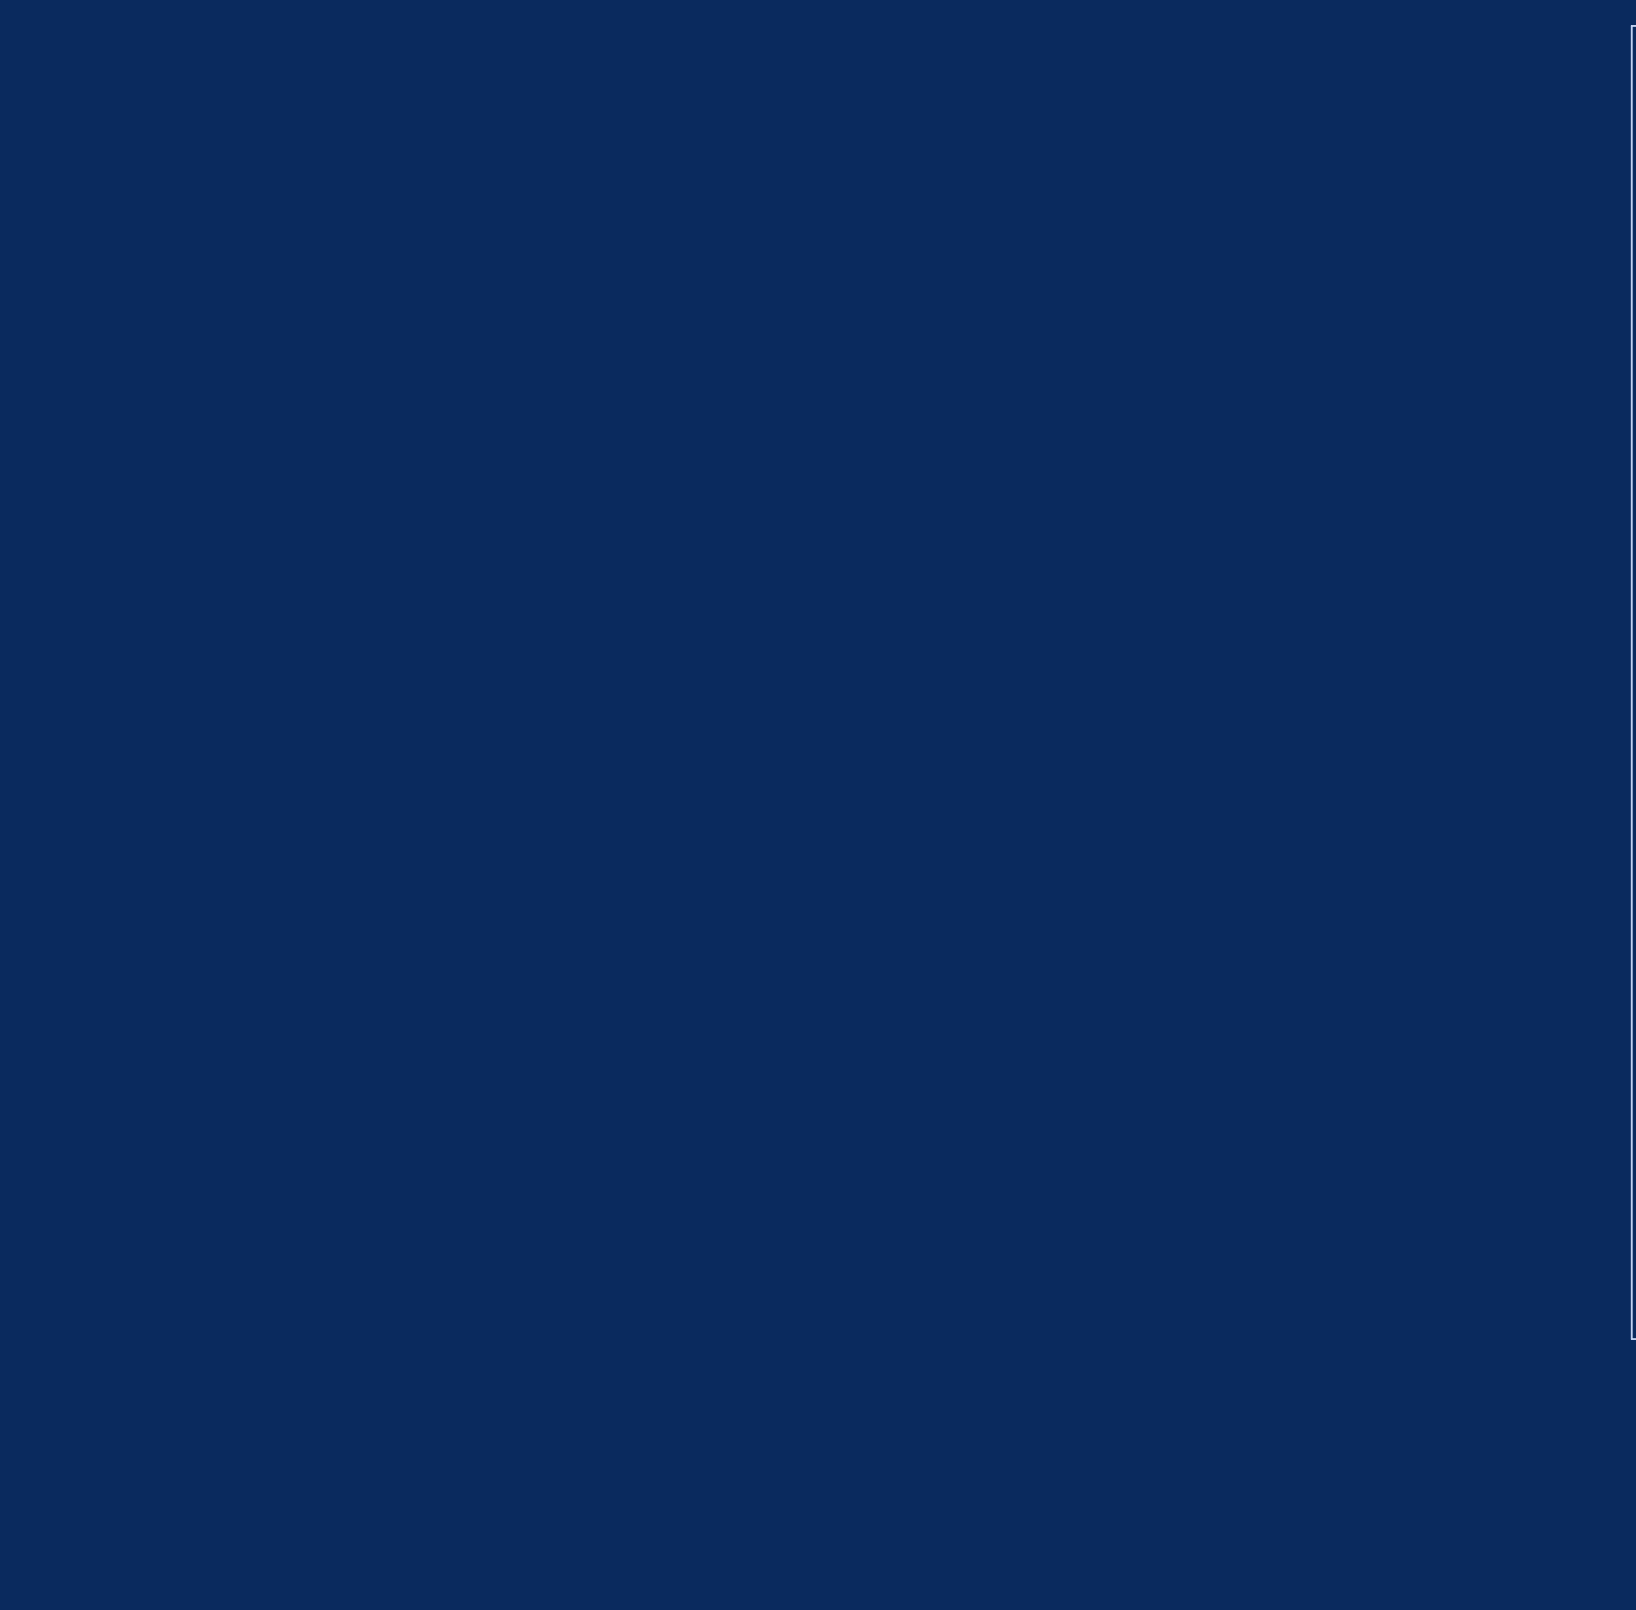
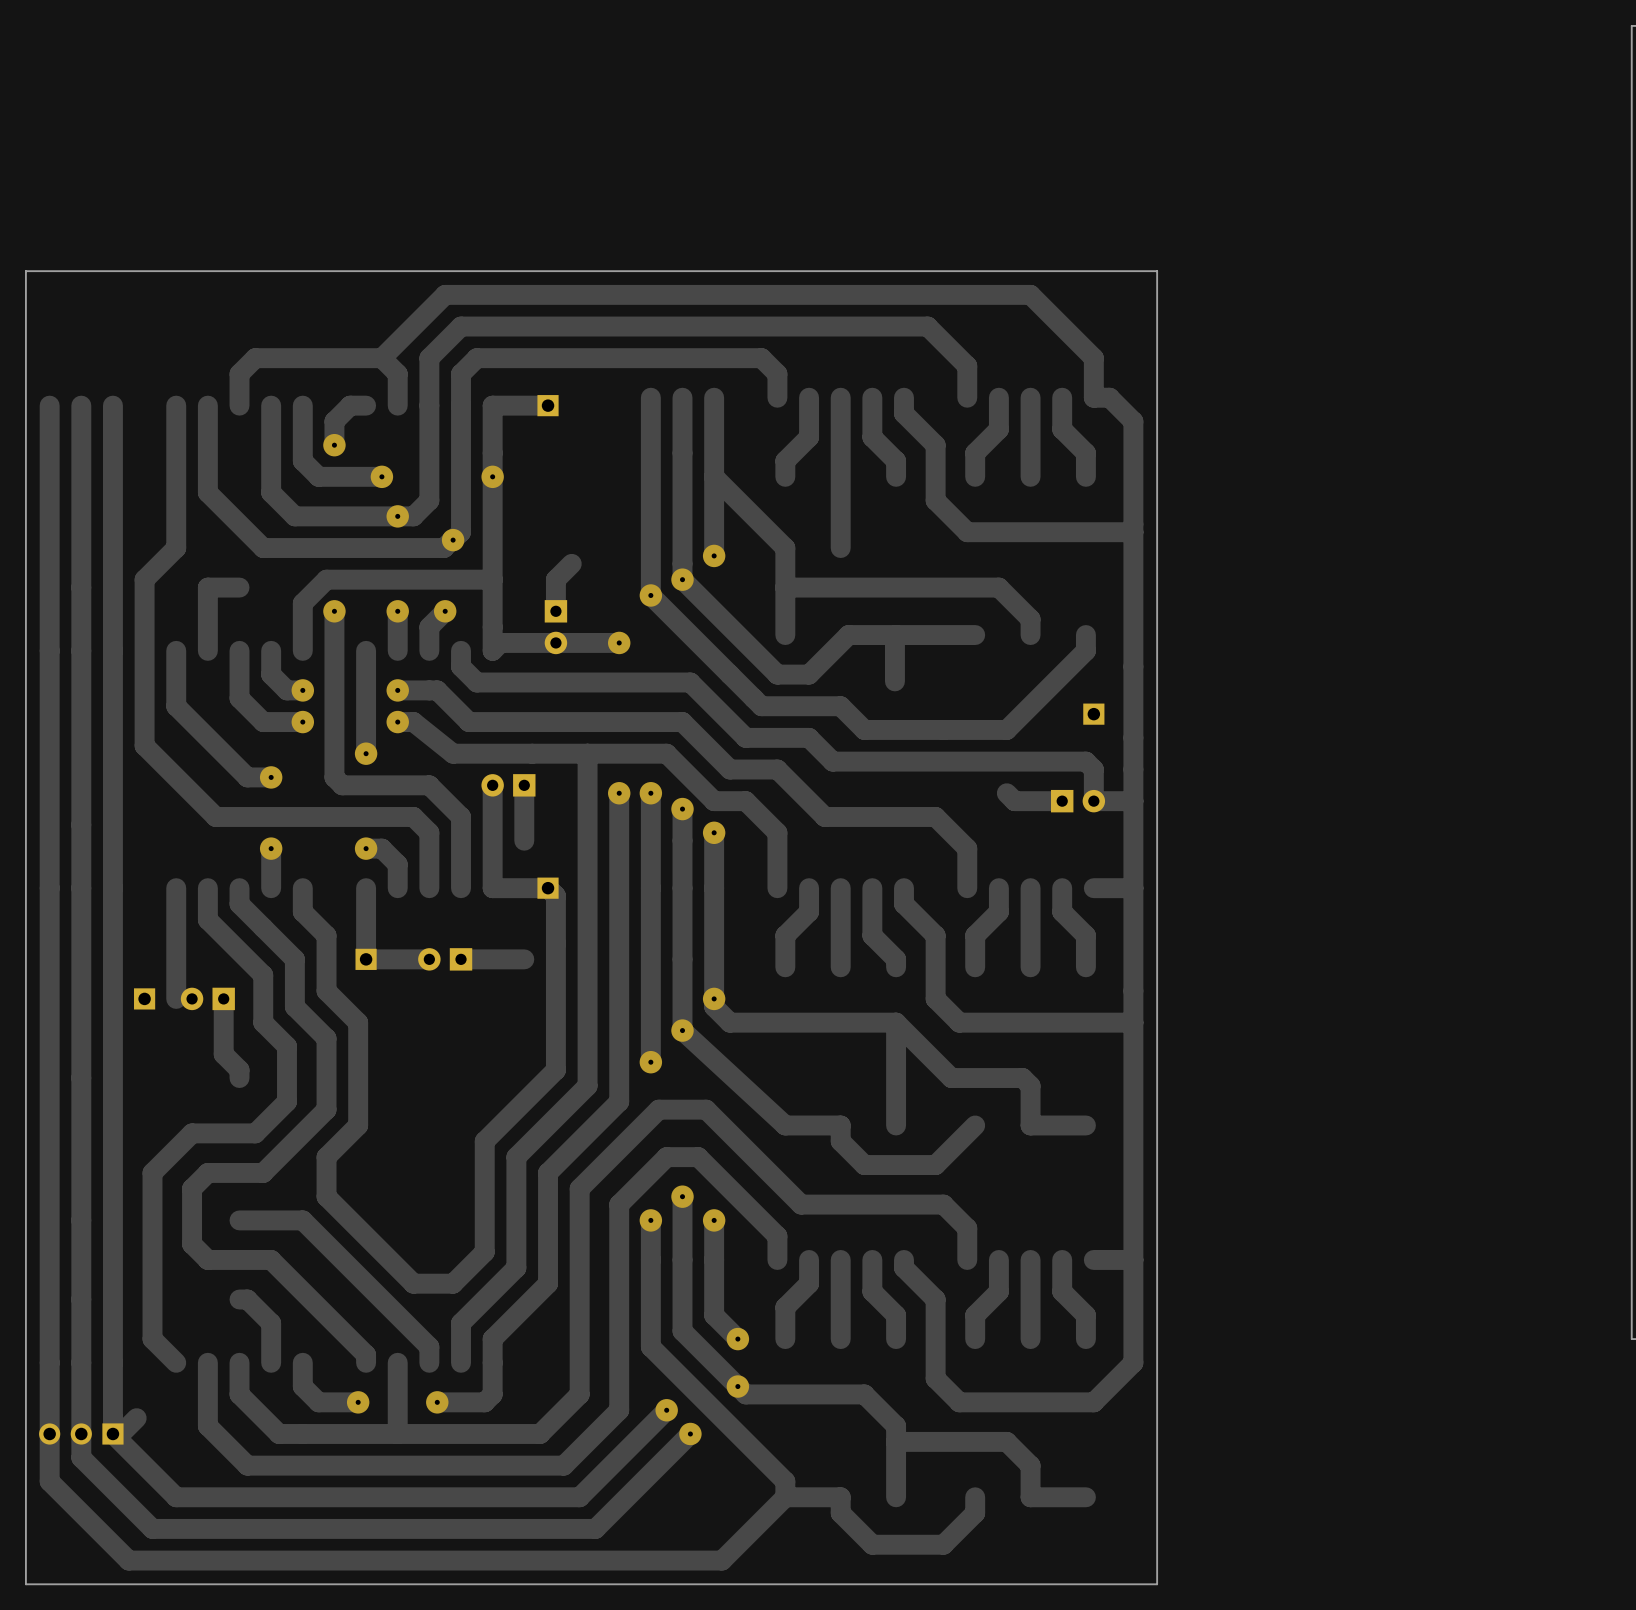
board edge: none -> (1157, 271) (1157, 1584) (25, 1584) (25, 271) (1157, 271)
track: none -> (381, 358) (397, 373) (397, 405)
track: none -> (381, 358) (255, 358) (239, 373) (239, 405)
track: none -> (381, 358) (445, 294) (1030, 294) (1093, 358) (1093, 397) (1109, 397) (1133, 421) (1133, 1362) (1093, 1402) (959, 1402) (935, 1378) (935, 1299) (903, 1267) (903, 1259)
track: none -> (650, 397) (650, 595) (761, 706) (840, 706) (864, 729) (1006, 729) (1085, 650) (1085, 635)
track: none -> (682, 397) (682, 579) (777, 674) (809, 674) (848, 635) (975, 635)
track: none -> (714, 397) (714, 555)
track: none -> (777, 397) (777, 373) (761, 358) (476, 358) (461, 373) (461, 532) (444, 548) (263, 548) (207, 492) (207, 405)
track: none -> (809, 397) (809, 437) (785, 461) (785, 476)
track: none -> (840, 397) (840, 548)
track: none -> (872, 397) (872, 437) (896, 461) (896, 476)
track: none -> (903, 397) (903, 413) (935, 445) (935, 500) (967, 532) (1133, 532)
track: none -> (967, 397) (967, 366) (927, 326) (461, 326) (429, 358) (429, 500) (413, 516) (294, 516) (271, 492) (271, 405)
track: none -> (998, 397) (998, 429) (975, 453) (975, 476)
track: none -> (1030, 397) (1030, 476)
track: none -> (1062, 397) (1062, 429) (1085, 453) (1085, 476)
track: none -> (49, 405) (49, 1481) (128, 1560) (722, 1560) (785, 1497)
track: none -> (81, 405) (81, 1457) (152, 1528) (595, 1528) (690, 1433)
track: none -> (112, 405) (112, 1433)
track: none -> (176, 405) (176, 548) (144, 579) (144, 745) (215, 816) (413, 816) (429, 832) (429, 888)
track: none -> (302, 405) (302, 461) (318, 476) (381, 476)
track: none -> (366, 405) (350, 405) (334, 421) (334, 445)
track: none -> (548, 405) (492, 405) (492, 650) (500, 642) (619, 642)
part: none -> (548, 405)
via: none -> (334, 445)
via: none -> (381, 476)
via: none -> (492, 476)
track: none -> (714, 476) (785, 548) (785, 635)
via: none -> (397, 516)
via: none -> (453, 540)
via: none -> (714, 555)
track: none -> (571, 563) (555, 579) (555, 611)
track: none -> (492, 579) (326, 579) (302, 603) (302, 650)
via: none -> (682, 579)
track: none -> (239, 587) (207, 587) (207, 650)
track: none -> (785, 587) (998, 587) (1030, 619) (1030, 635)
via: none -> (650, 595)
track: none -> (334, 611) (334, 777) (342, 785) (429, 785) (461, 816) (461, 888)
via: none -> (334, 611)
track: none -> (397, 611) (397, 650)
via: none -> (397, 611)
track: none -> (445, 611) (429, 627) (429, 650)
via: none -> (445, 611)
part: none -> (555, 627)
track: none -> (896, 635) (894, 681)
via: none -> (619, 642)
track: none -> (176, 650) (176, 706) (247, 777) (271, 777)
track: none -> (239, 650) (239, 698) (263, 722) (302, 722)
track: none -> (271, 650) (271, 674) (286, 690) (302, 690)
track: none -> (366, 650) (366, 753)
track: none -> (461, 650) (461, 666) (476, 682) (690, 682) (745, 737) (809, 737) (832, 761) (1085, 761) (1093, 769) (1093, 801) (1133, 801)
via: none -> (302, 690)
track: none -> (397, 690) (437, 690) (468, 722) (682, 722) (729, 769) (777, 769) (824, 816) (935, 816) (967, 848) (967, 888)
via: none -> (397, 690)
part: none -> (1093, 714)
via: none -> (302, 722)
track: none -> (397, 722) (413, 722) (453, 753) (666, 753) (714, 801) (745, 801) (777, 832) (777, 888)
via: none -> (397, 722)
via: none -> (366, 753)
track: none -> (587, 753) (587, 1085) (516, 1157) (516, 1267) (461, 1323) (461, 1362)
via: none -> (271, 777)
track: none -> (492, 785) (492, 888) (548, 888) (555, 896) (555, 1070) (484, 1141) (484, 1252) (453, 1283) (413, 1283) (326, 1196) (326, 1157) (358, 1125) (358, 1022) (326, 991) (326, 935) (302, 911) (302, 888)
part: none -> (508, 785)
track: none -> (524, 785) (524, 840)
track: none -> (619, 793) (619, 1101) (548, 1172) (548, 1283) (492, 1339) (492, 1394) (484, 1402) (437, 1402)
via: none -> (619, 793)
track: none -> (650, 793) (650, 1062)
via: none -> (650, 793)
track: none -> (1006, 793) (1014, 801) (1062, 801)
part: none -> (1078, 801)
track: none -> (682, 809) (682, 1030) (785, 1125) (840, 1125) (840, 1141) (864, 1165) (935, 1165) (975, 1125)
via: none -> (682, 809)
track: none -> (714, 832) (714, 1006) (729, 1022) (896, 1022)
via: none -> (714, 832)
track: none -> (271, 848) (271, 888)
via: none -> (271, 848)
track: none -> (366, 848) (381, 848) (397, 864) (397, 888)
via: none -> (366, 848)
track: none -> (176, 888) (176, 998)
track: none -> (207, 888) (207, 919) (263, 975) (263, 1022) (286, 1046) (286, 1101) (255, 1133) (192, 1133) (152, 1172) (152, 1339) (176, 1362)
track: none -> (239, 888) (239, 903) (294, 959) (294, 1006) (326, 1038) (326, 1109) (263, 1172) (207, 1172) (192, 1188) (192, 1244) (207, 1259) (271, 1259) (366, 1354) (366, 1362)
track: none -> (366, 888) (366, 959) (429, 959)
part: none -> (548, 888)
track: none -> (809, 888) (809, 911) (785, 935) (785, 967)
track: none -> (840, 888) (840, 967)
track: none -> (872, 888) (872, 935) (896, 959) (896, 967)
track: none -> (903, 888) (903, 903) (935, 935) (935, 998) (959, 1022) (1133, 1022)
track: none -> (998, 888) (998, 911) (975, 935) (975, 967)
track: none -> (1030, 888) (1030, 967)
track: none -> (1062, 888) (1062, 911) (1085, 935) (1085, 967)
track: none -> (1133, 888) (1093, 888)
part: none -> (366, 959)
part: none -> (445, 959)
track: none -> (524, 959) (461, 959)
part: none -> (144, 998)
part: none -> (207, 998)
track: none -> (223, 998) (223, 1054) (239, 1070) (239, 1078)
via: none -> (714, 998)
track: none -> (896, 1022) (896, 1125)
track: none -> (896, 1022) (951, 1078) (1022, 1078) (1030, 1085) (1030, 1125) (1085, 1125)
via: none -> (682, 1030)
via: none -> (650, 1062)
track: none -> (682, 1196) (682, 1331) (745, 1394) (864, 1394) (896, 1426) (896, 1497)
via: none -> (682, 1196)
track: none -> (239, 1220) (302, 1220) (429, 1346) (429, 1362)
track: none -> (650, 1220) (650, 1346) (785, 1481) (785, 1497)
via: none -> (650, 1220)
track: none -> (714, 1220) (714, 1315) (737, 1339)
via: none -> (714, 1220)
track: none -> (777, 1259) (777, 1236) (698, 1157) (666, 1157) (619, 1204) (619, 1410) (563, 1465) (247, 1465) (207, 1426) (207, 1362)
track: none -> (809, 1259) (809, 1283) (785, 1307) (785, 1339)
track: none -> (840, 1259) (840, 1339)
track: none -> (872, 1259) (872, 1291) (896, 1315) (896, 1339)
track: none -> (967, 1259) (967, 1228) (943, 1204) (801, 1204) (706, 1109) (658, 1109) (579, 1188) (579, 1394) (540, 1433) (279, 1433) (239, 1394) (239, 1362)
track: none -> (998, 1259) (998, 1291) (975, 1315) (975, 1339)
track: none -> (1030, 1259) (1030, 1339)
track: none -> (1062, 1259) (1062, 1291) (1085, 1315) (1085, 1339)
track: none -> (1133, 1259) (1093, 1259)
track: none -> (239, 1299) (247, 1299) (271, 1323) (271, 1362)
via: none -> (737, 1339)
track: none -> (302, 1362) (302, 1386) (318, 1402) (358, 1402)
track: none -> (397, 1362) (397, 1433)
via: none -> (737, 1386)
via: none -> (358, 1402)
via: none -> (437, 1402)
track: none -> (666, 1410) (579, 1497) (176, 1497) (112, 1433)
via: none -> (666, 1410)
track: none -> (136, 1418) (120, 1433) (112, 1433)
part: none -> (81, 1433)
via: none -> (690, 1433)
track: none -> (896, 1441) (1006, 1441) (1030, 1465) (1030, 1497) (1085, 1497)
track: none -> (975, 1497) (975, 1513) (943, 1544) (872, 1544) (840, 1513) (840, 1497) (785, 1497)

